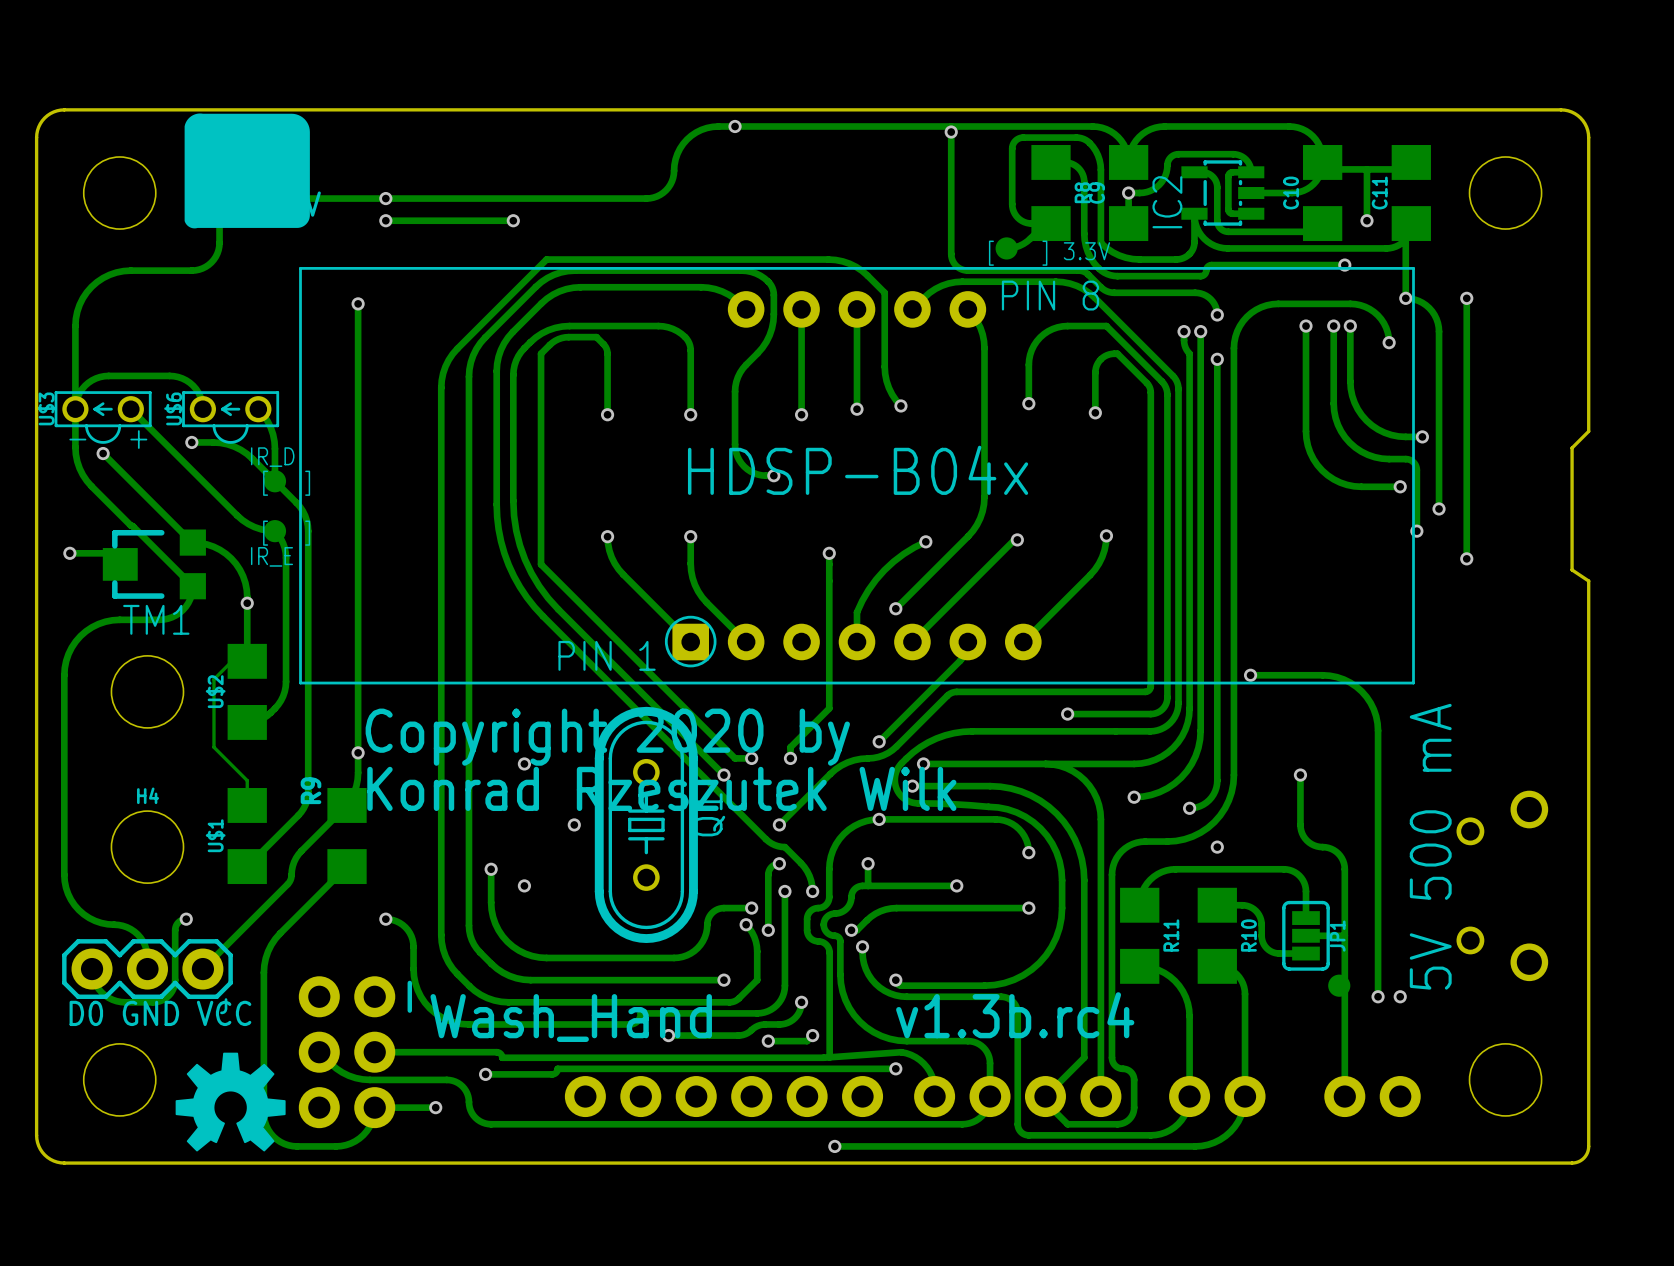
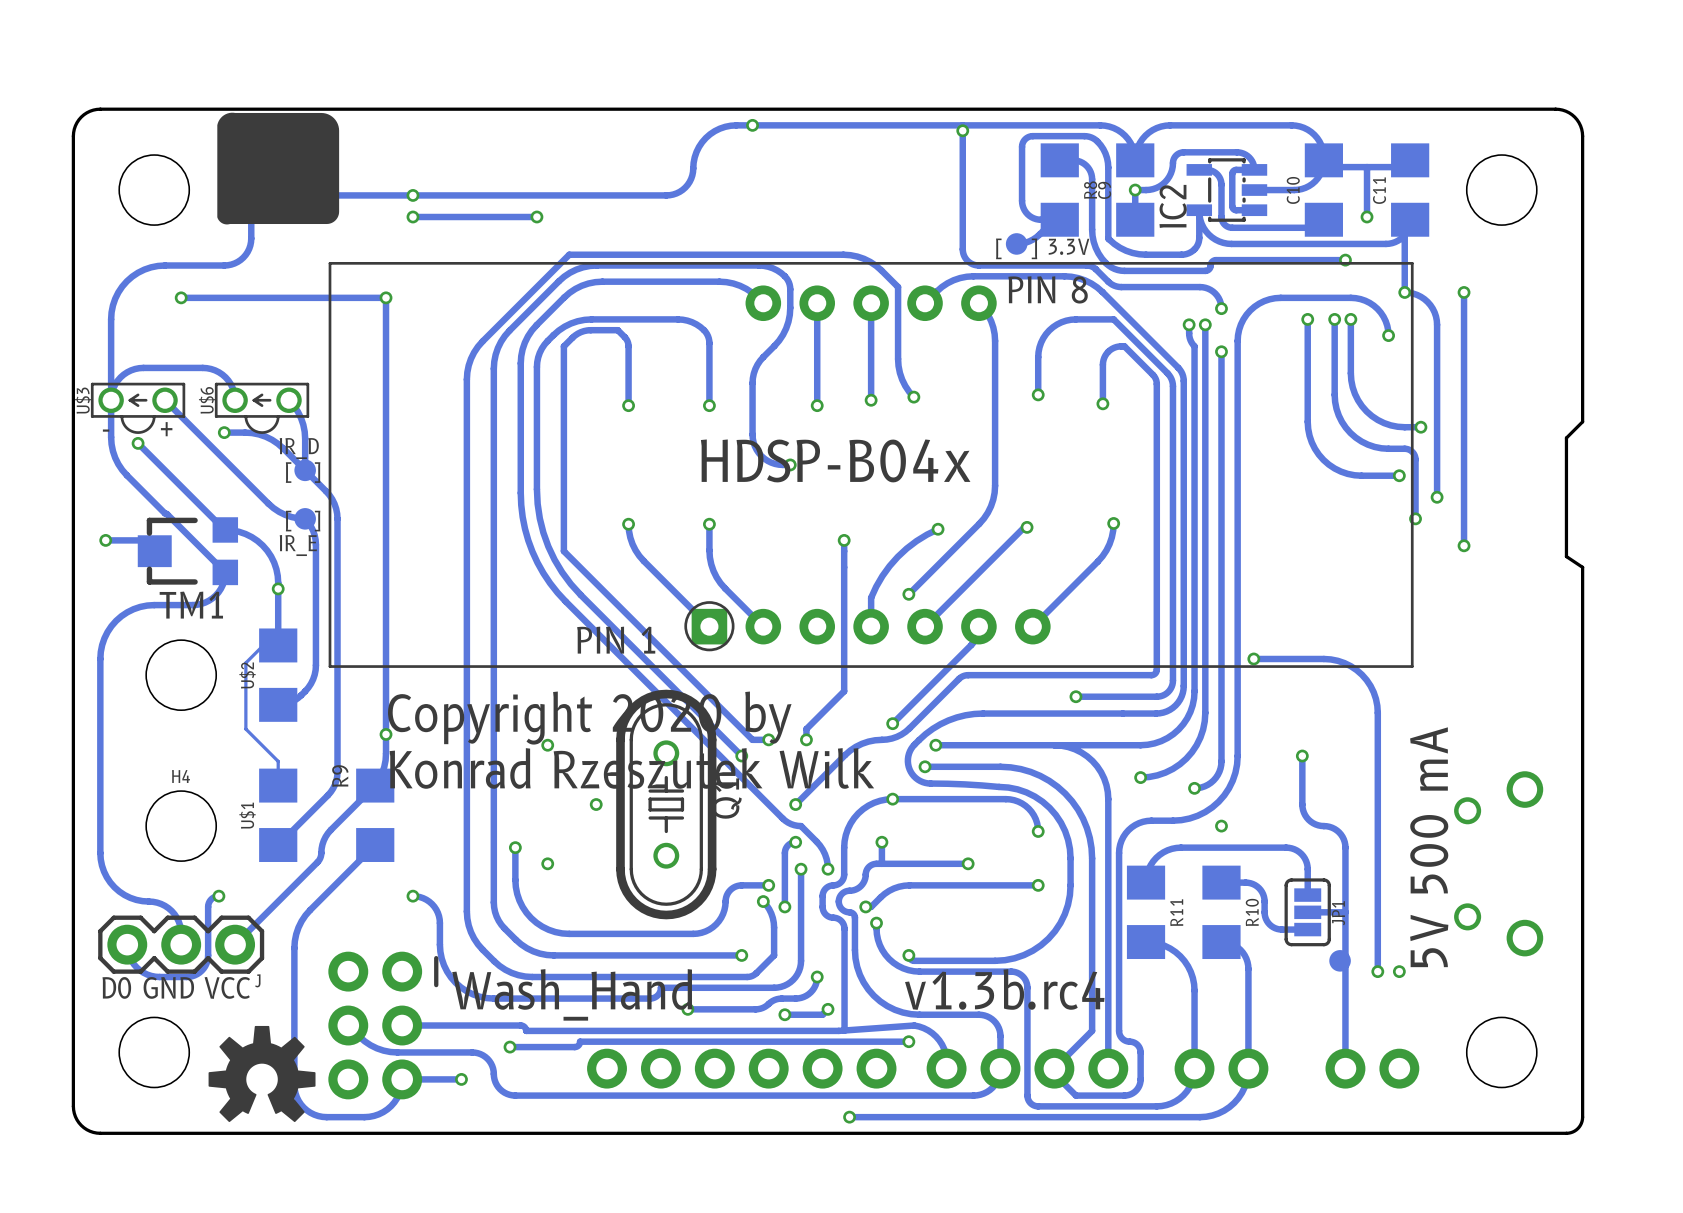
via: none -> (181, 297)
track: none -> (386, 297) (181, 297)

